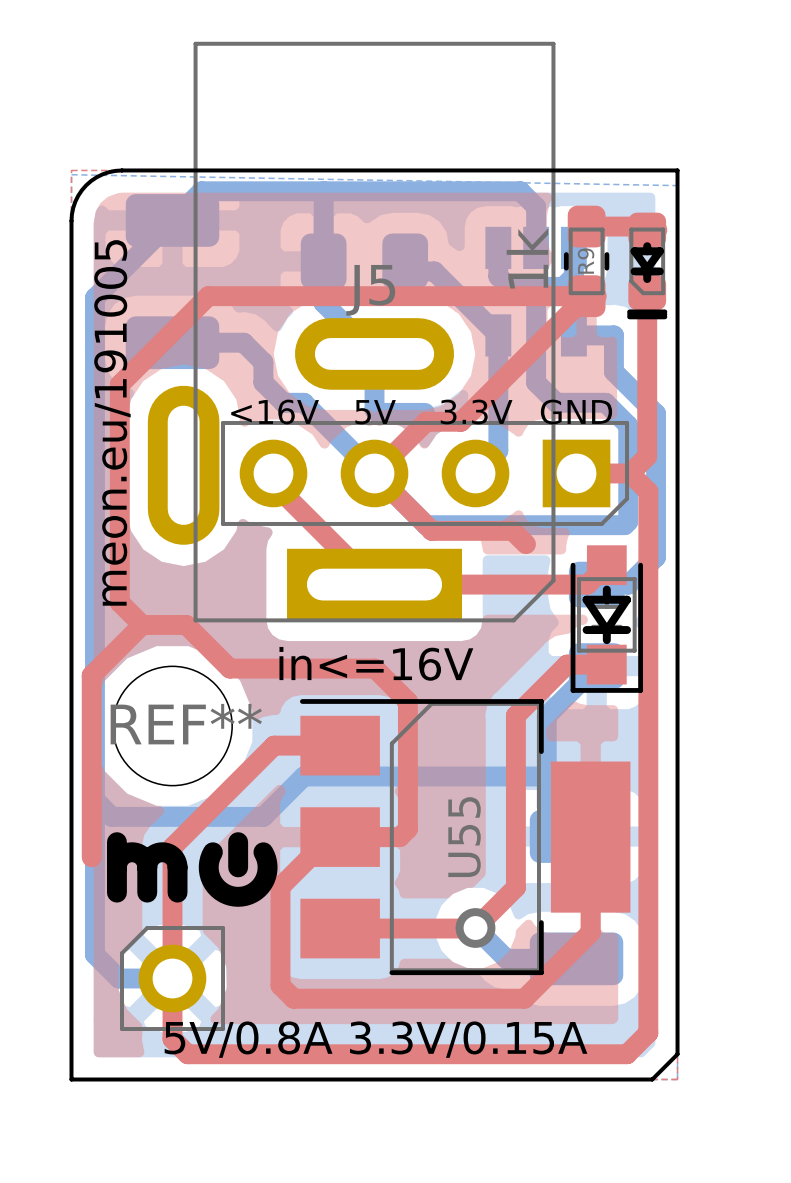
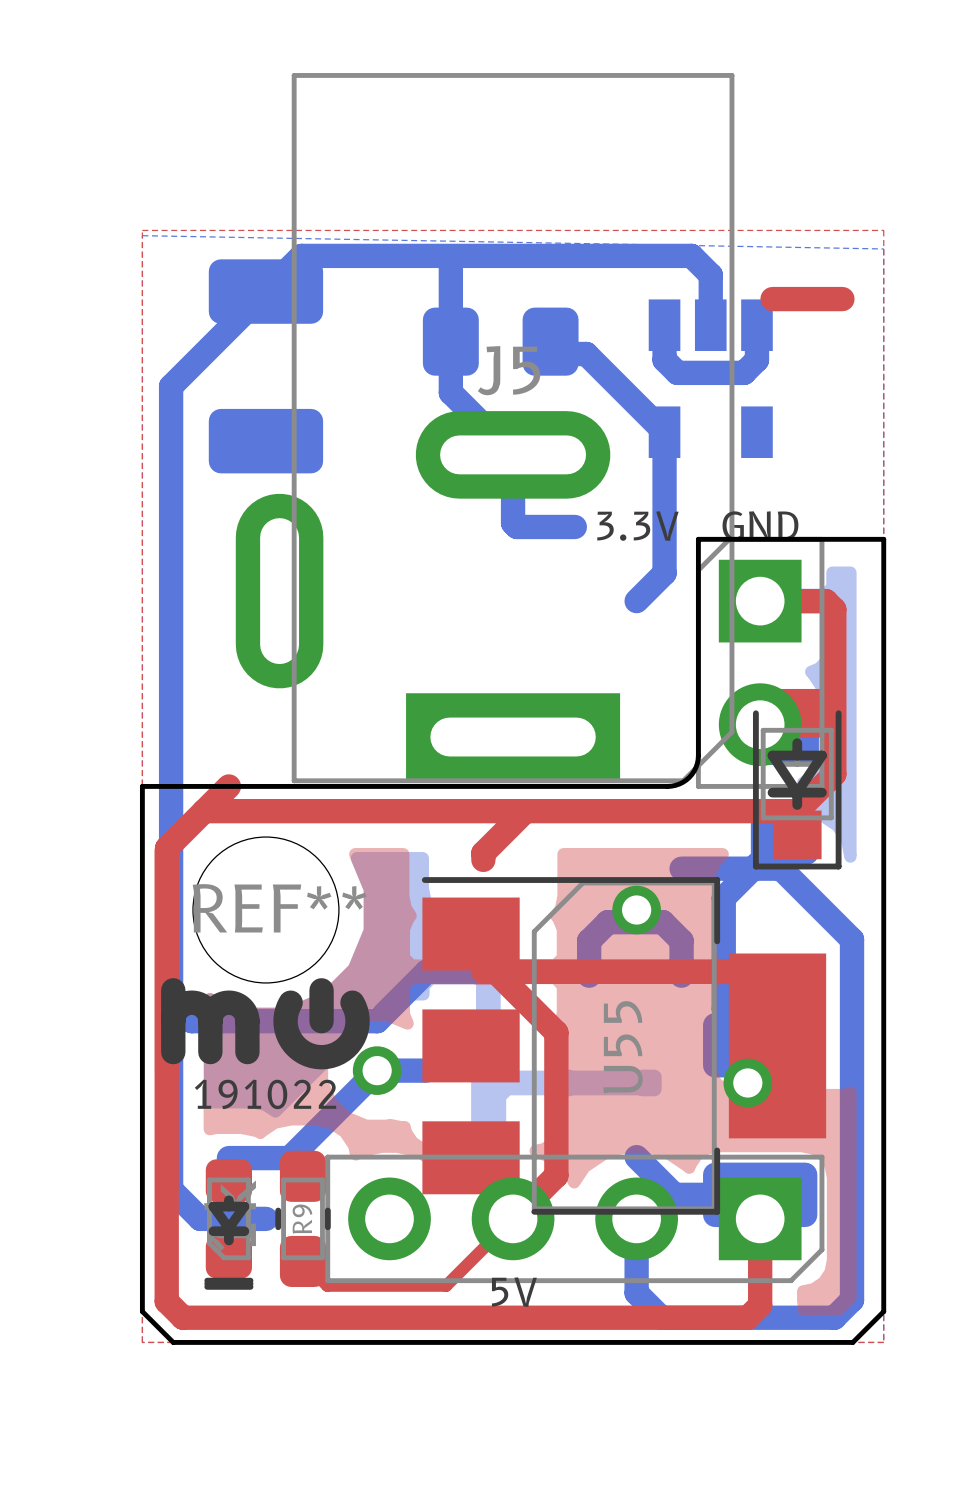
R9 position: (586, 261) -> (303, 1218)
part: (647, 265) -> none
bottom track: (536, 286) (536, 382) (556, 402) (605, 402) (628, 425) (628, 521) (624, 525) (426, 525) (303, 402) (283, 402) (263, 382) (263, 362) (243, 342) (172, 342) -> none
top track: (647, 292) (647, 456) (630, 473) -> none
top track: (586, 296) (461, 421) (426, 421) (374, 473) (431, 530) (512, 530) (526, 544) -> none
top track: (596, 296) (208, 296) (119, 384) (119, 602) (142, 624) (186, 624) (229, 668) (374, 668) (407, 701) (407, 828) (399, 837) (330, 837) (280, 886) (280, 985) (293, 998) (524, 998) (590, 932) (590, 837) -> none
bottom track: (573, 335) (613, 335) (613, 371) (656, 413) (656, 557) (628, 584) (596, 584) -> none
text: <16V (275, 412) -> none
text: 5V (375, 412) -> none
text: meon.eu/191005 (112, 422) -> none
board edge: (677, 422) (677, 170) (122, 170) (108, 172) (96, 177) (86, 185) (78, 195) (71, 214) (71, 624) -> (883, 539) (698, 539) (698, 759) (692, 774) (682, 782) (675, 785) (142, 786)
top track: (273, 473) (273, 483) (374, 584) (587, 584) (606, 565) -> none
part position: (425, 473) -> (574, 1218)
top track: (637, 480) (648, 491) (648, 1032) (627, 1054) (187, 1054) (172, 1039) (172, 847) (274, 745) (340, 745) -> (834, 609) (834, 774) (797, 811) (204, 811)
part: none -> (760, 662)
top track: none -> (525, 811) (483, 853) (483, 859)
text: in<=16V (376, 663) -> none
top track: (606, 664) (567, 664) (515, 715) (515, 887) (474, 928) (340, 928) -> none
top track: none -> (166, 850) (166, 1301) (182, 1317) (747, 1317) (760, 1305) (760, 1218)
bottom track: none -> (681, 868) (781, 868) (852, 939) (852, 1300) (834, 1317) (661, 1317) (636, 1293) (636, 1218)
via: none -> (636, 910)
top track: none -> (483, 971) (789, 971) (772, 989)
top track: none -> (495, 971) (556, 1032) (556, 1175) (446, 1285) (327, 1285) (303, 1261)
bottom track: none -> (589, 975) (589, 940) (607, 922) (662, 922) (681, 940) (681, 975)
bottom track: none -> (377, 1070) (289, 1158) (228, 1158)
via: none -> (377, 1070)
bottom track: none -> (389, 1070) (425, 1070)
via: none -> (747, 1082)
drawing position: (192, 869) -> (265, 1023)
text: none -> 191022 (265, 1094)
part footprint: [120, 926, 225, 1031] -> [204, 1159, 254, 1290]
via: (475, 928) -> none
text: 5V/0.8A 3.3V/0.15A (376, 1039) -> 5V (514, 1292)
board edge: (71, 1054) (71, 1079) (96, 1079) -> (142, 1311) (173, 1342)

